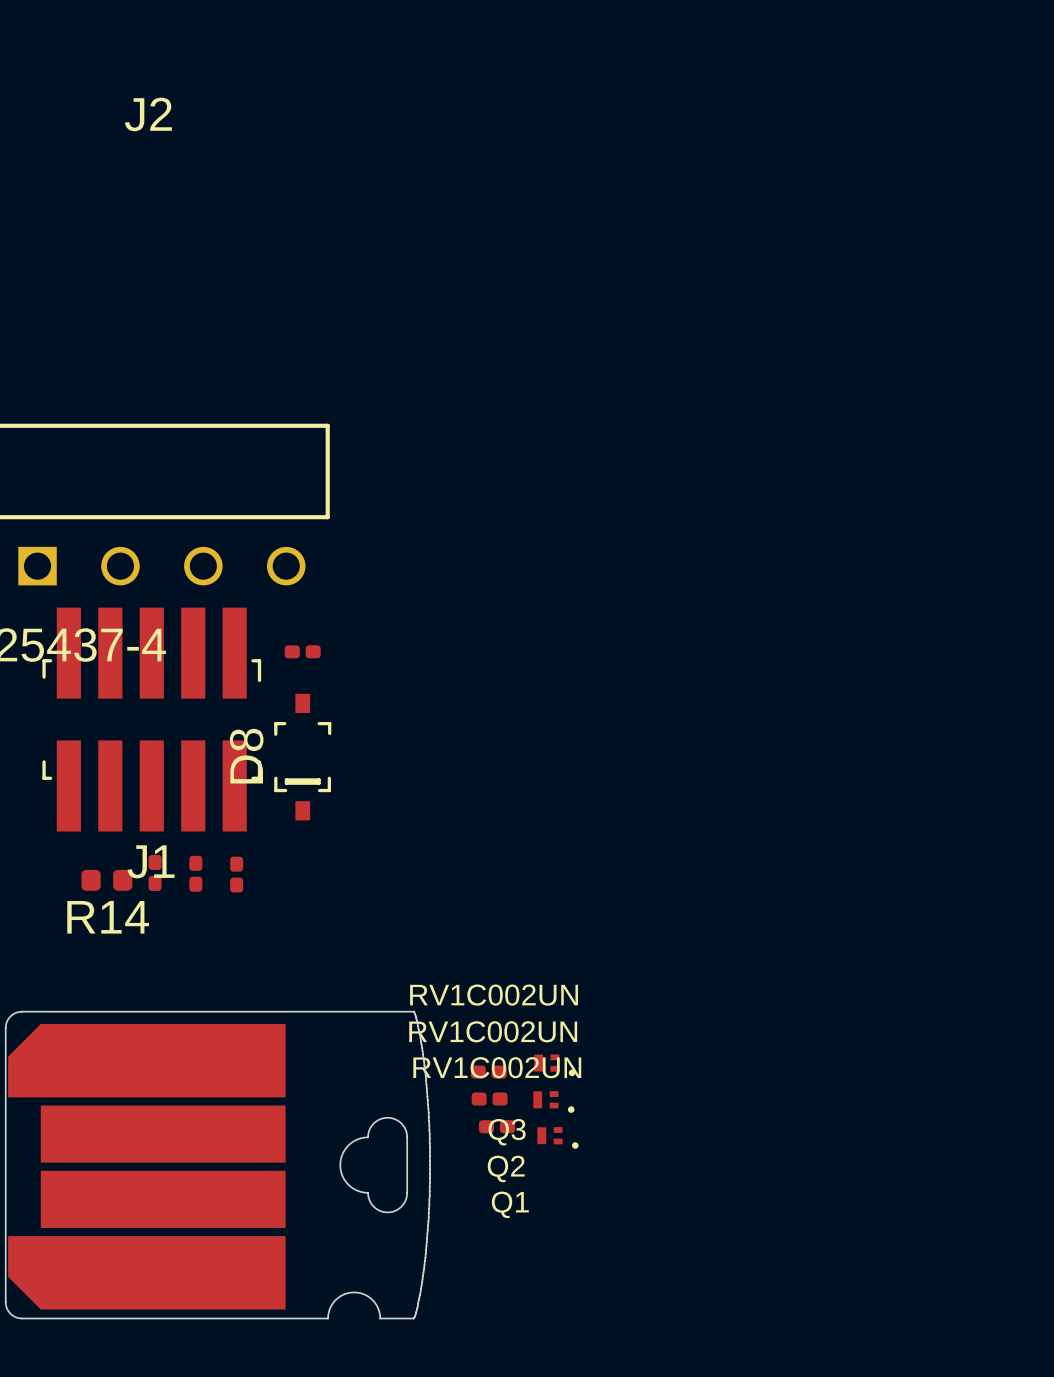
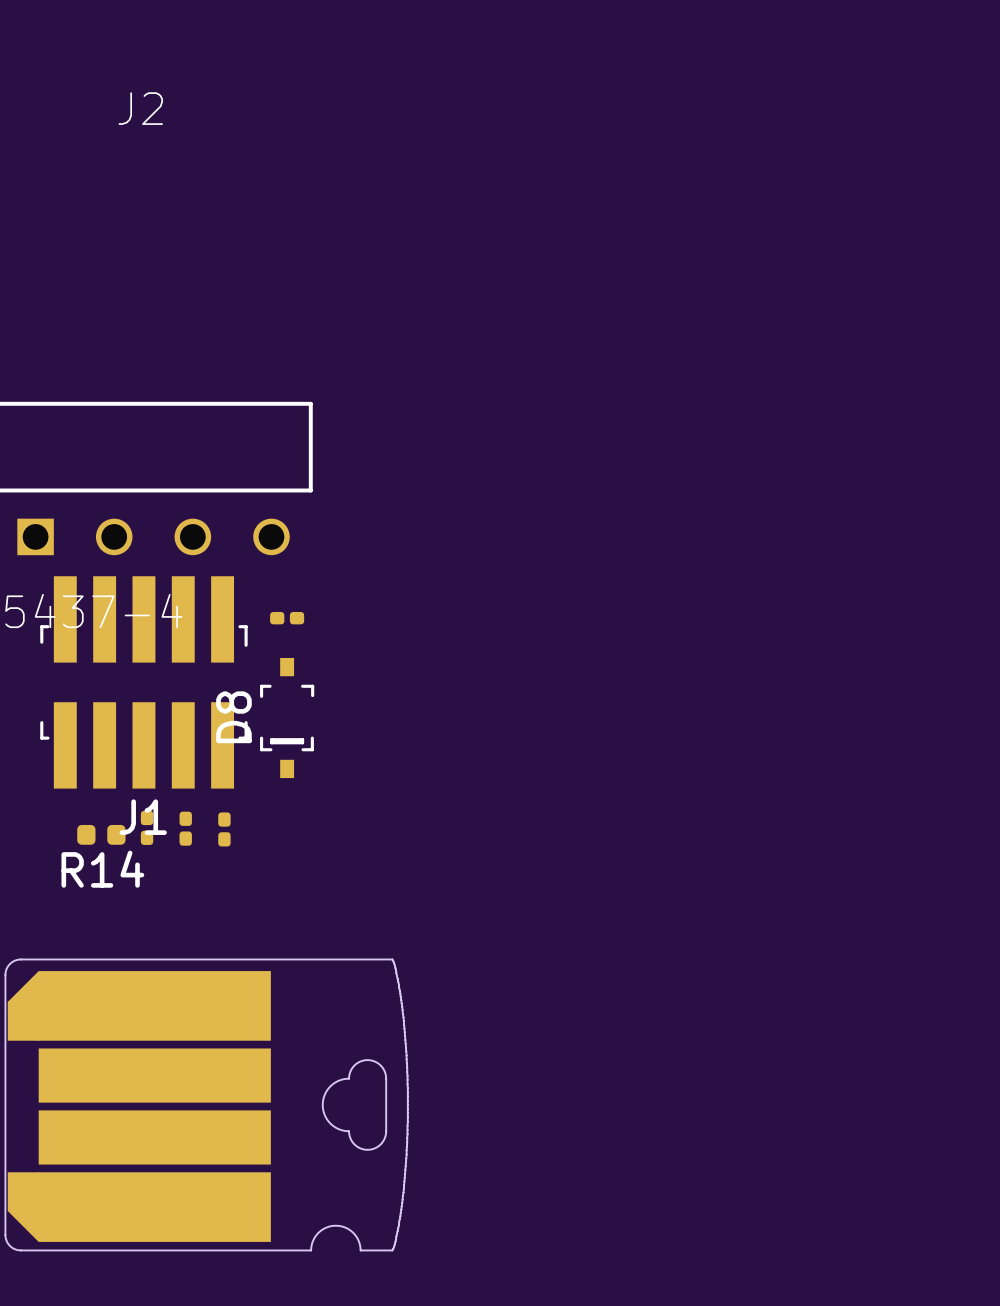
Q3: RV1C002UN (554, 1065) -> none
part: (488, 1072) -> none
part: (489, 1098) -> none
Q2: RV1C002UN (553, 1102) -> none
part: (496, 1126) -> none
Q1: RV1C002UN (557, 1137) -> none

